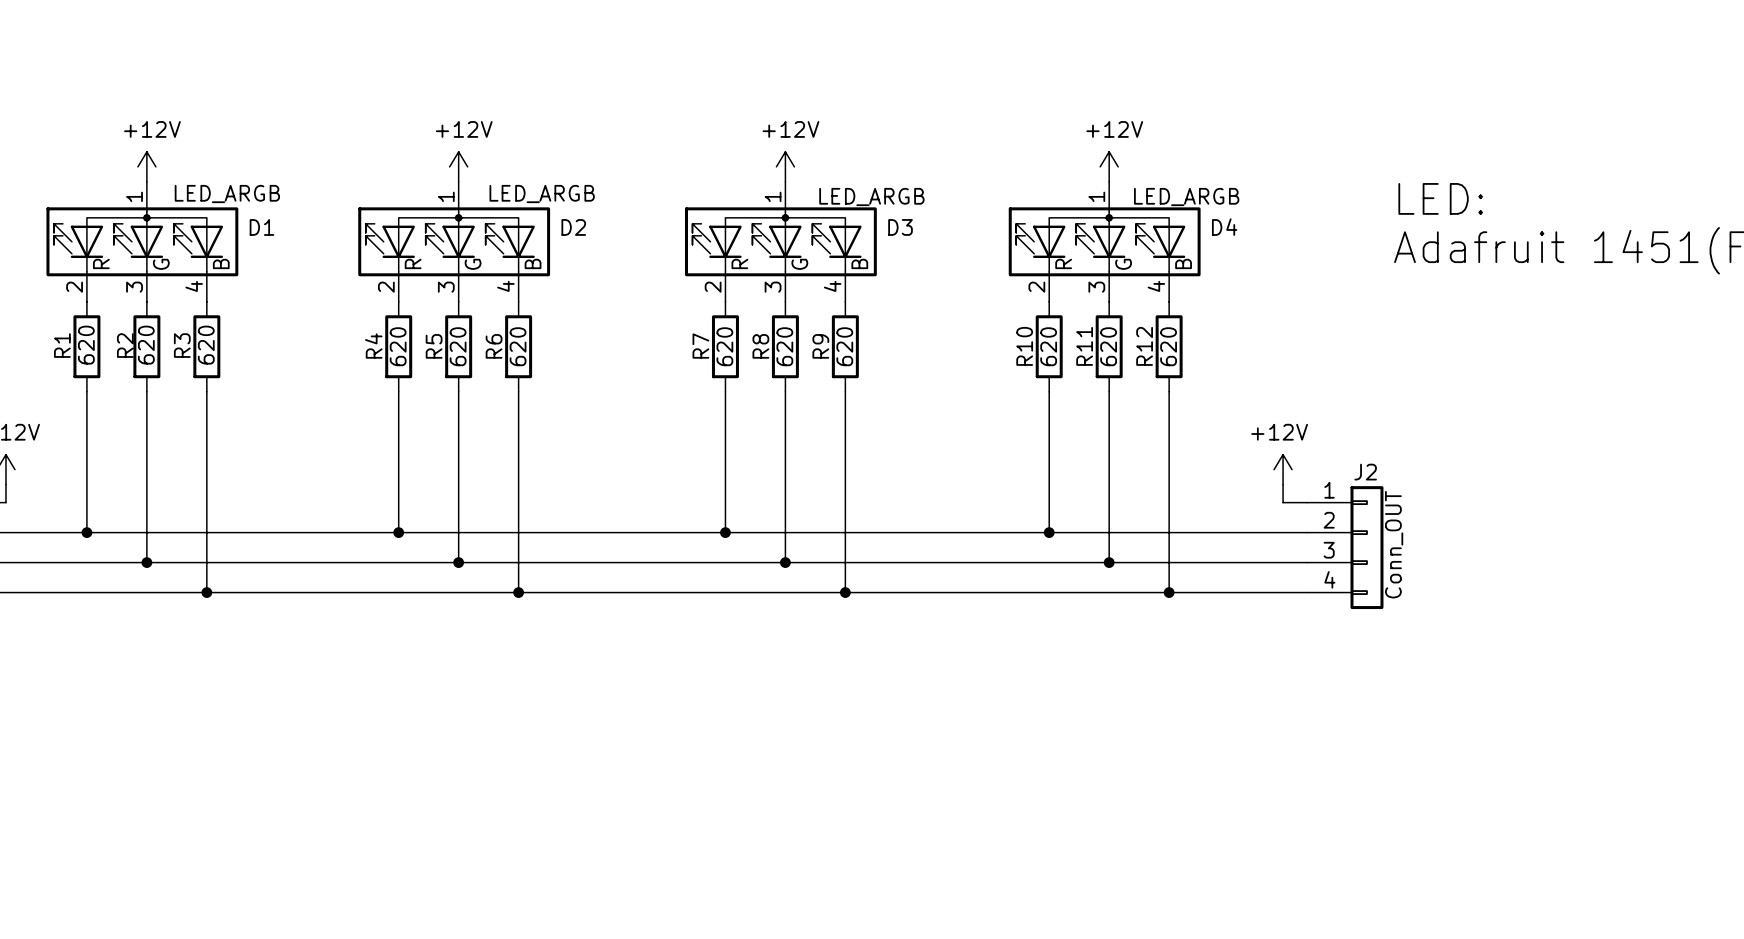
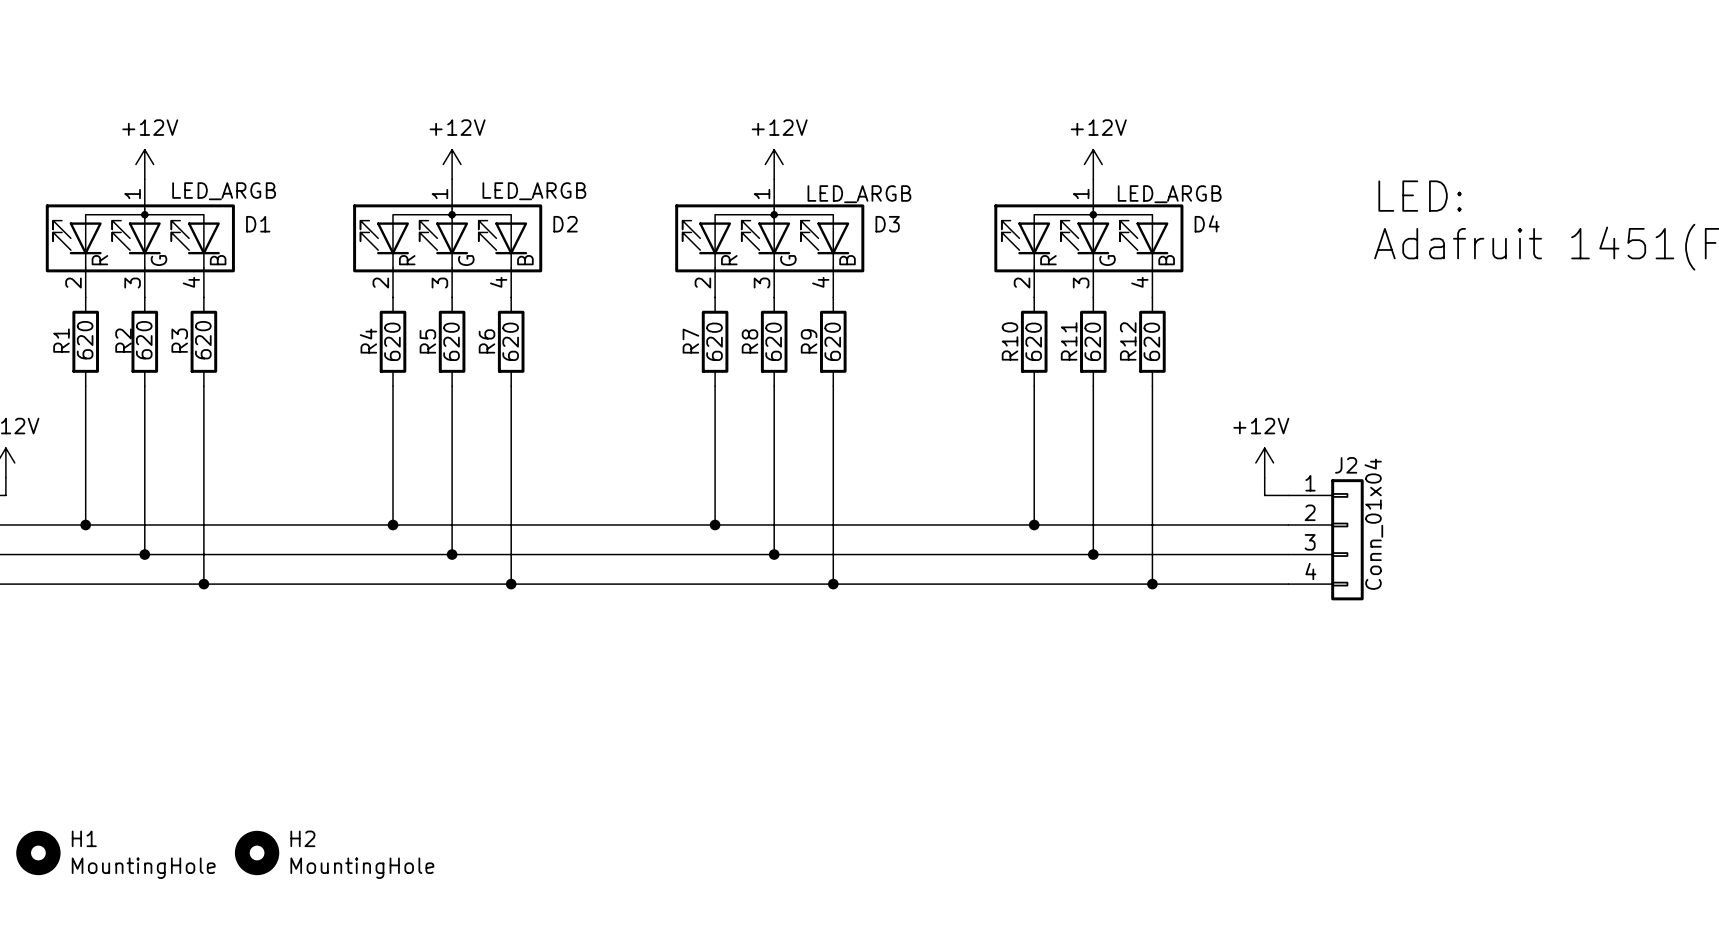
J2 value: Conn_OUT (1394, 544) -> Conn_01x04 (1373, 524)
H1: none -> MountingHole (38, 852)
H2: none -> MountingHole (257, 852)

